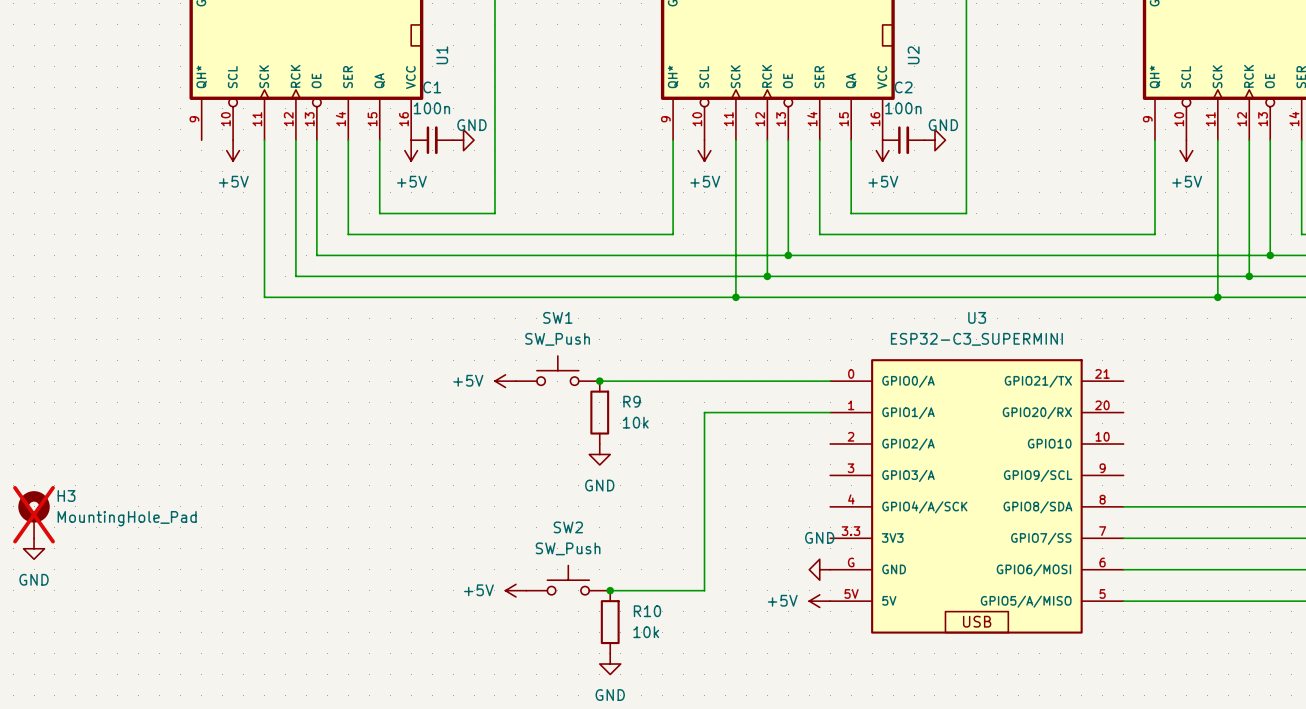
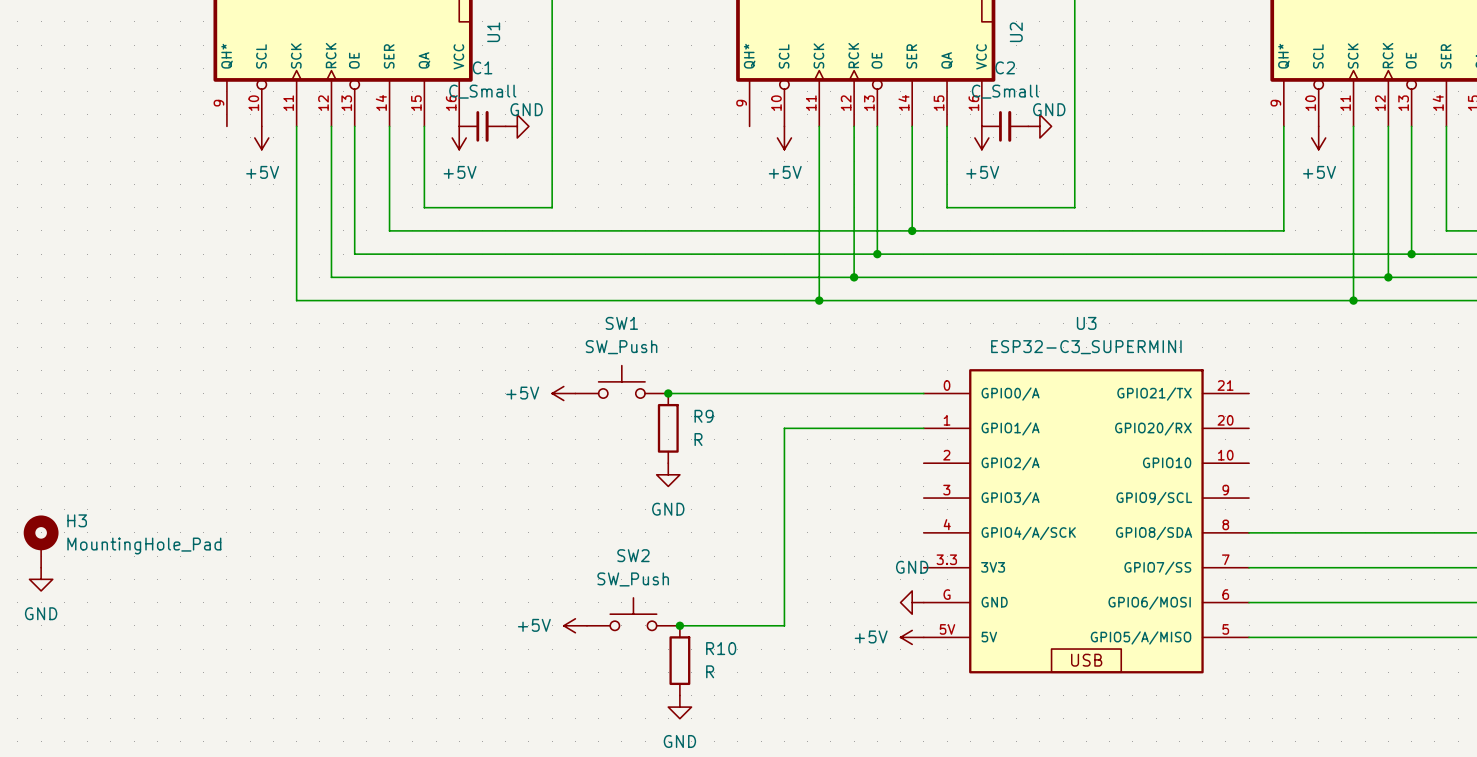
C1 value: 100n (431, 108) -> C_Small (482, 91)
C2 value: 100n (903, 108) -> C_Small (1005, 91)
wire: (673, 140) (673, 234) -> (912, 230) (749, 230)
junction: none -> (912, 230)
R9 value: 10k (635, 422) -> R (698, 439)
H3 do-not-place cross: (34, 514) -> none
R10 value: 10k (646, 632) -> R (710, 671)

